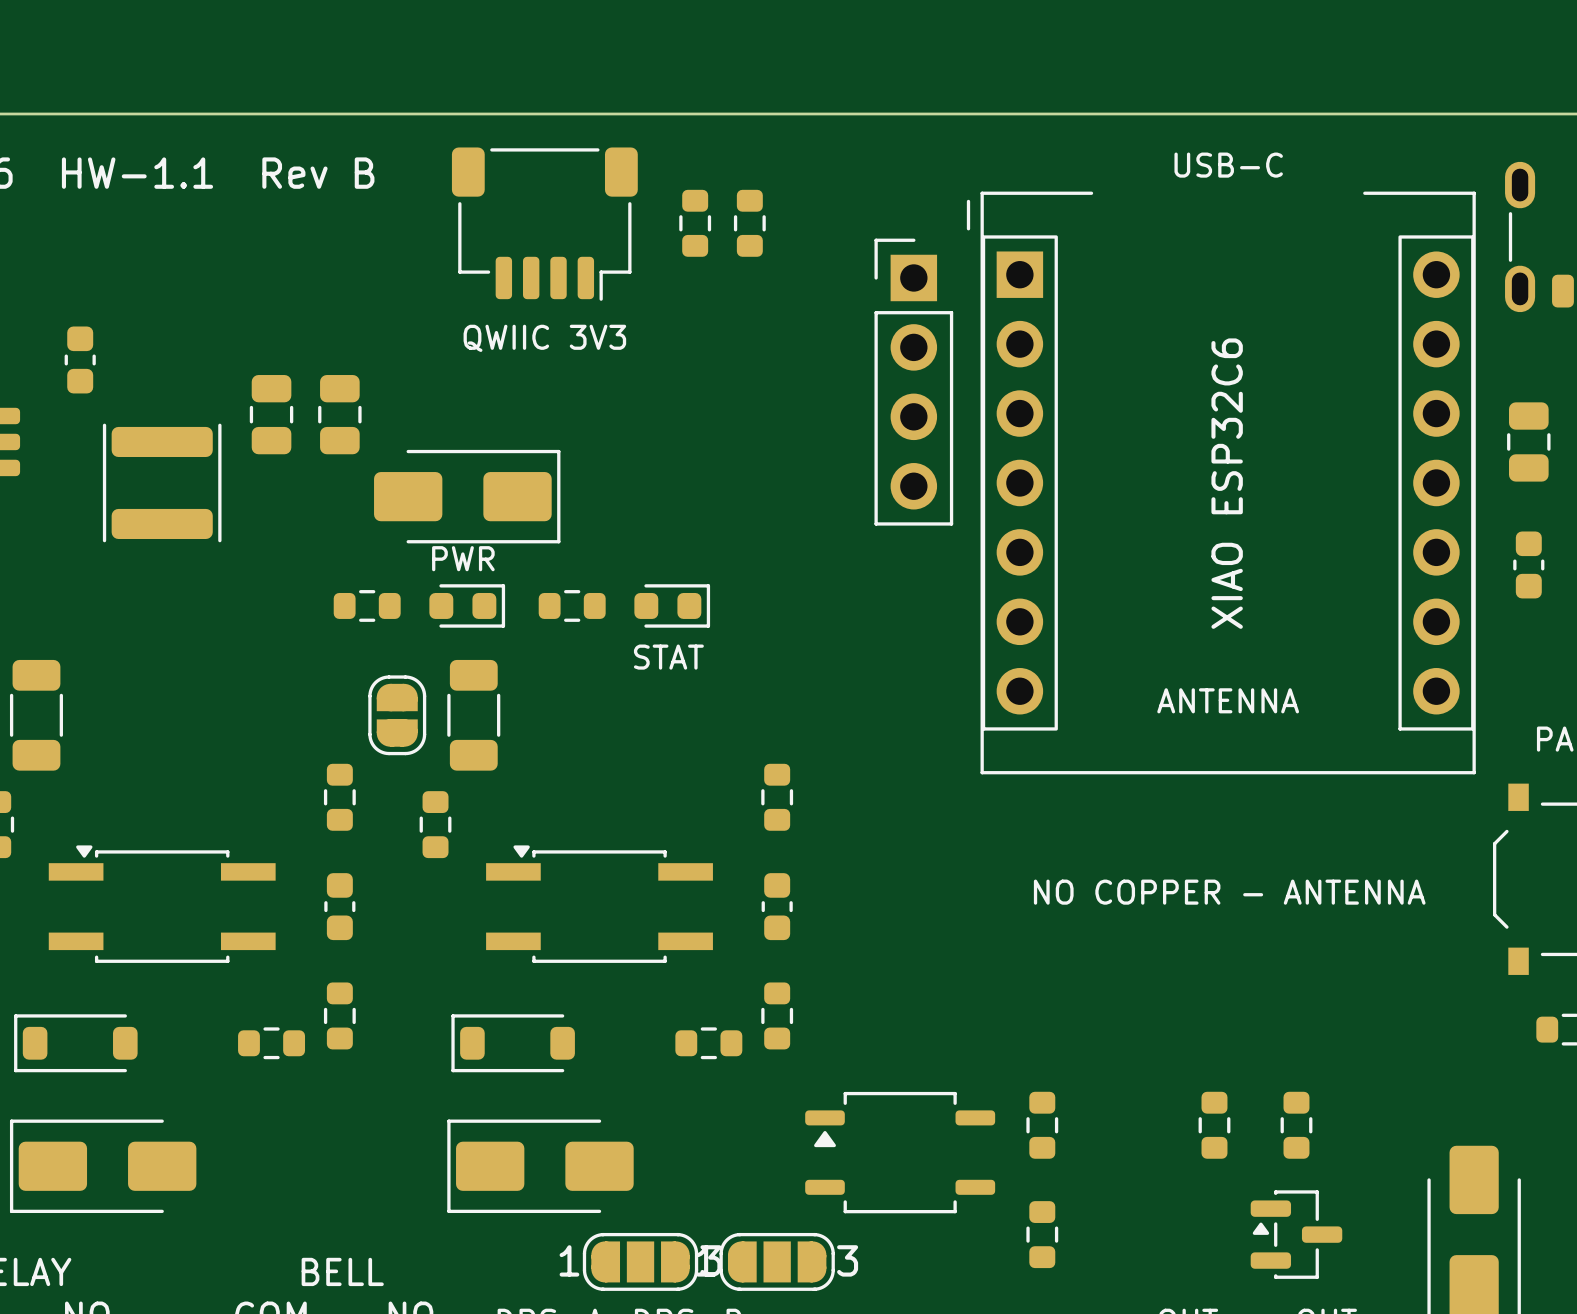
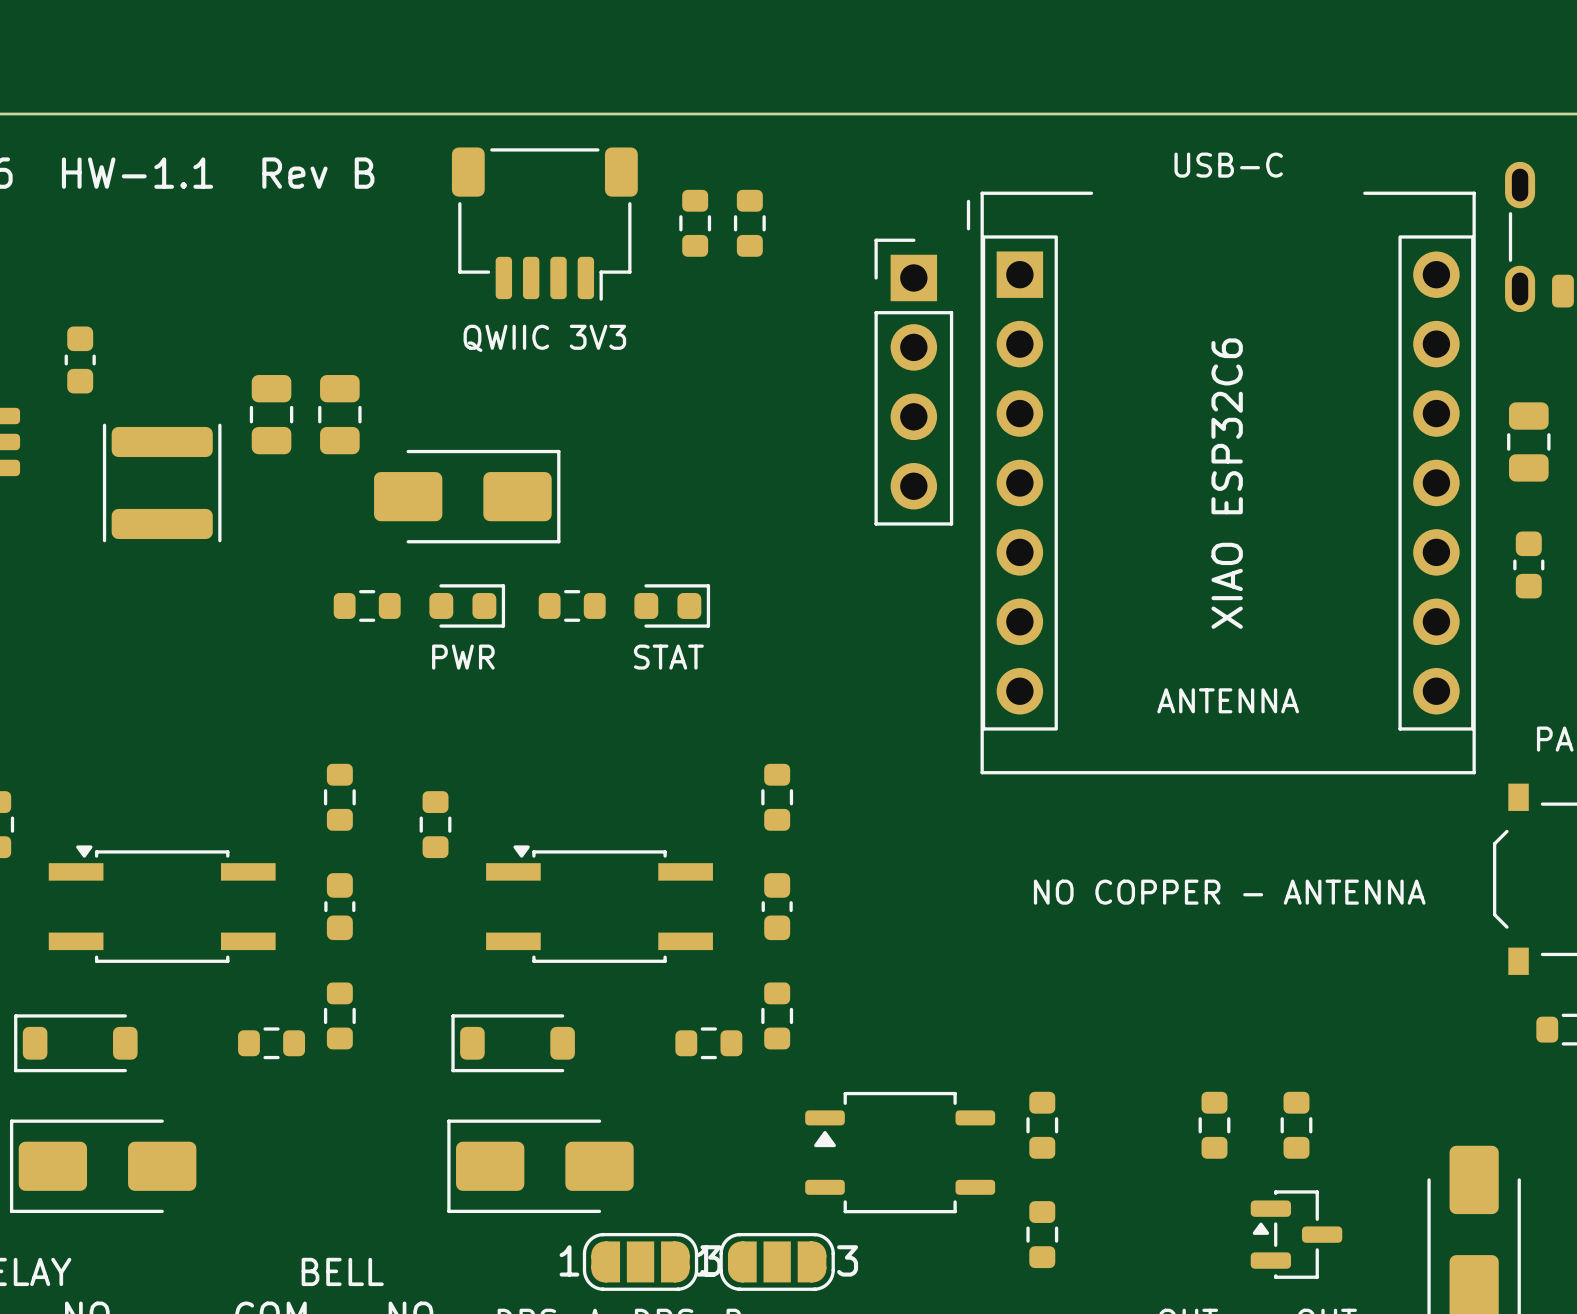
text position: PWR (463, 558) -> PWR (463, 657)
part: (36, 715) -> none
part: (397, 715) -> none
part: (473, 715) -> none

